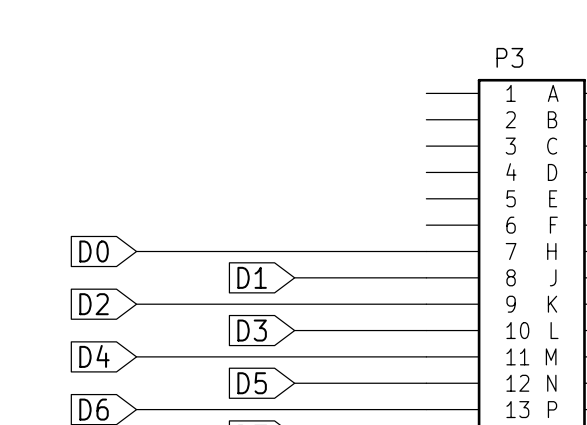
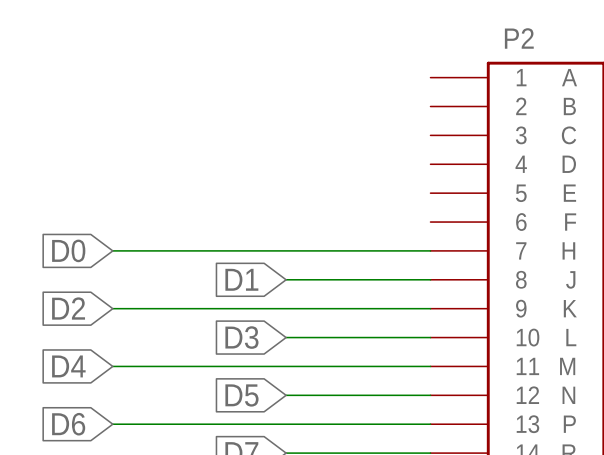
P3 name: P3 (509, 57) -> P2 (519, 38)

